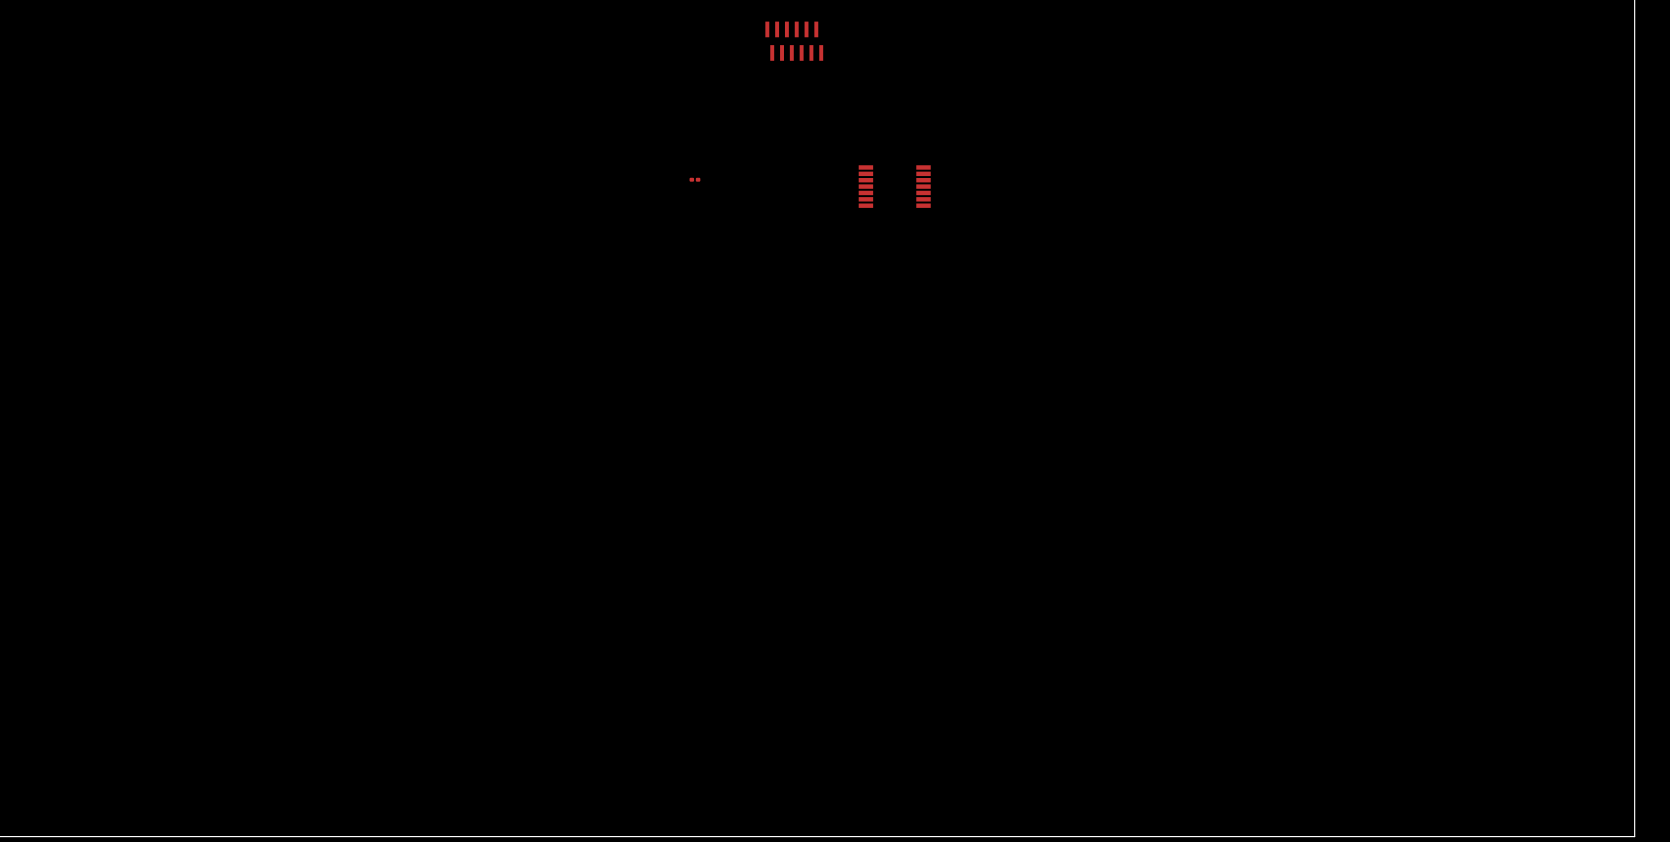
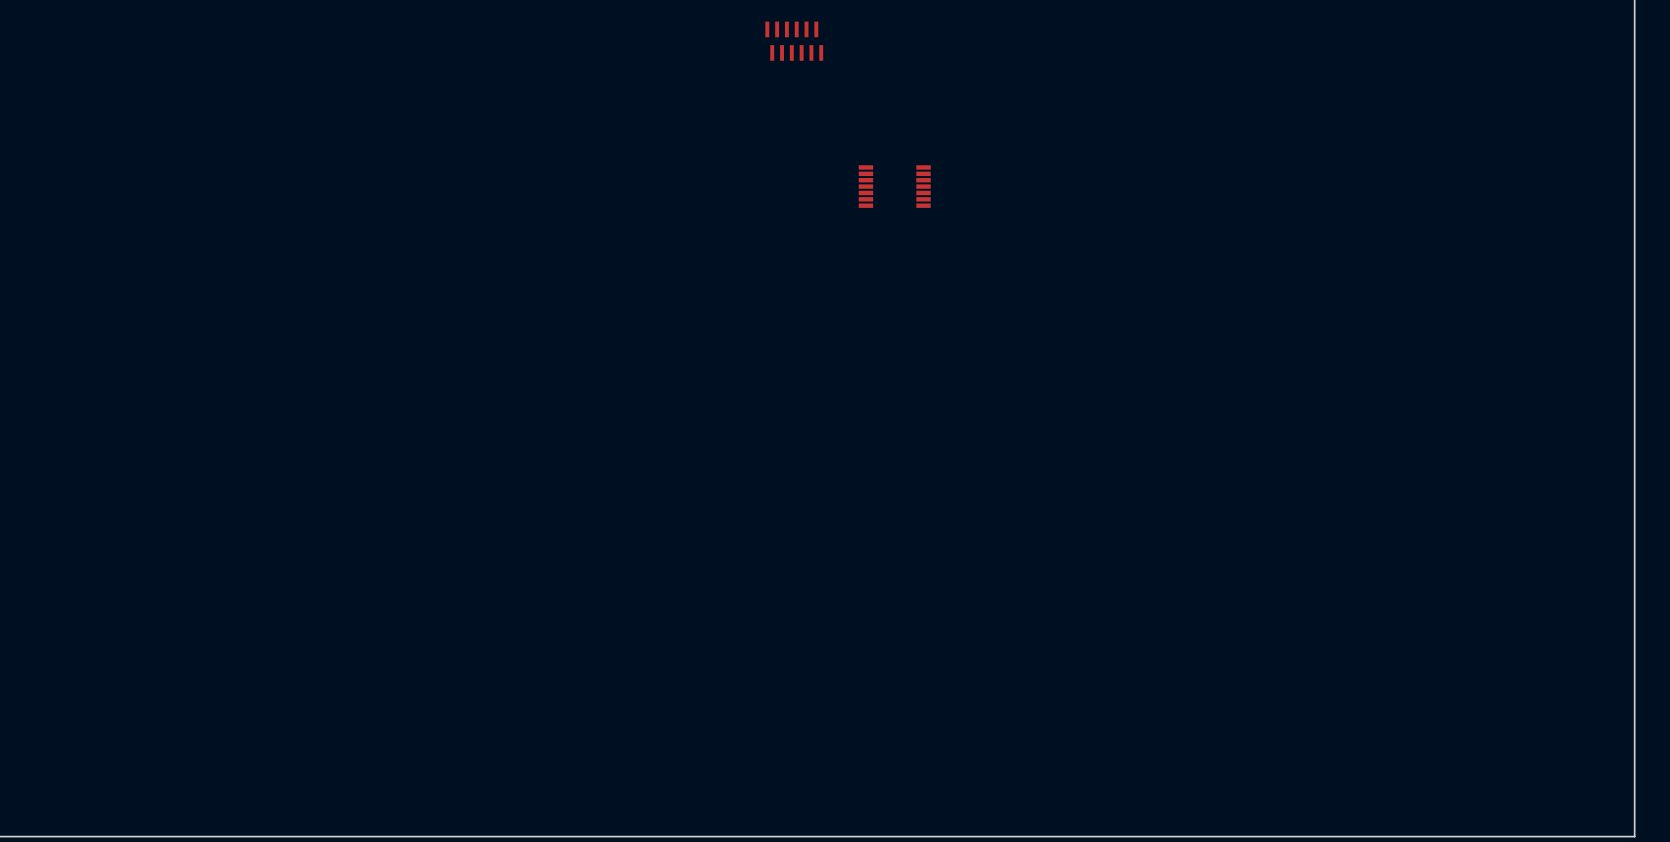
part: (694, 179) -> none

